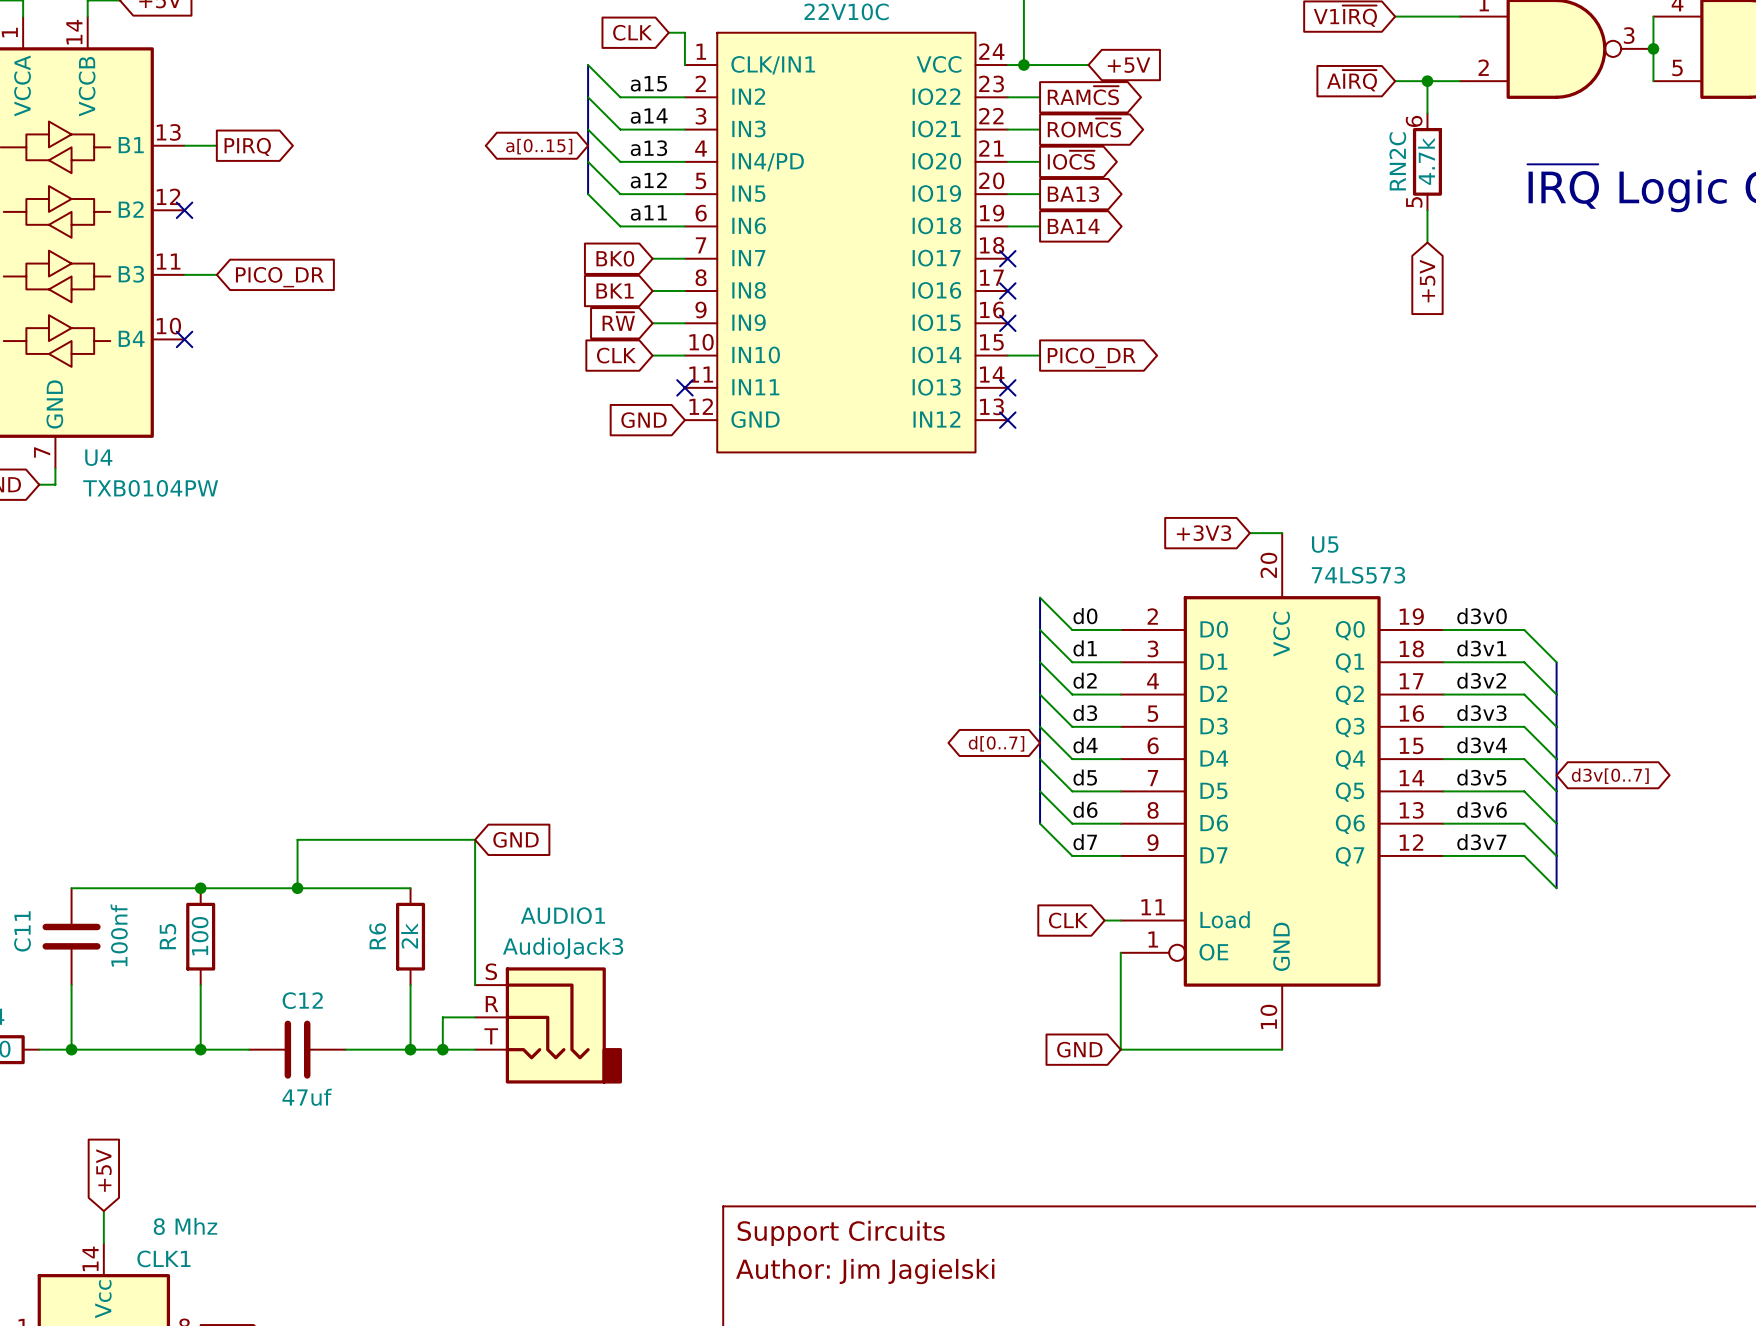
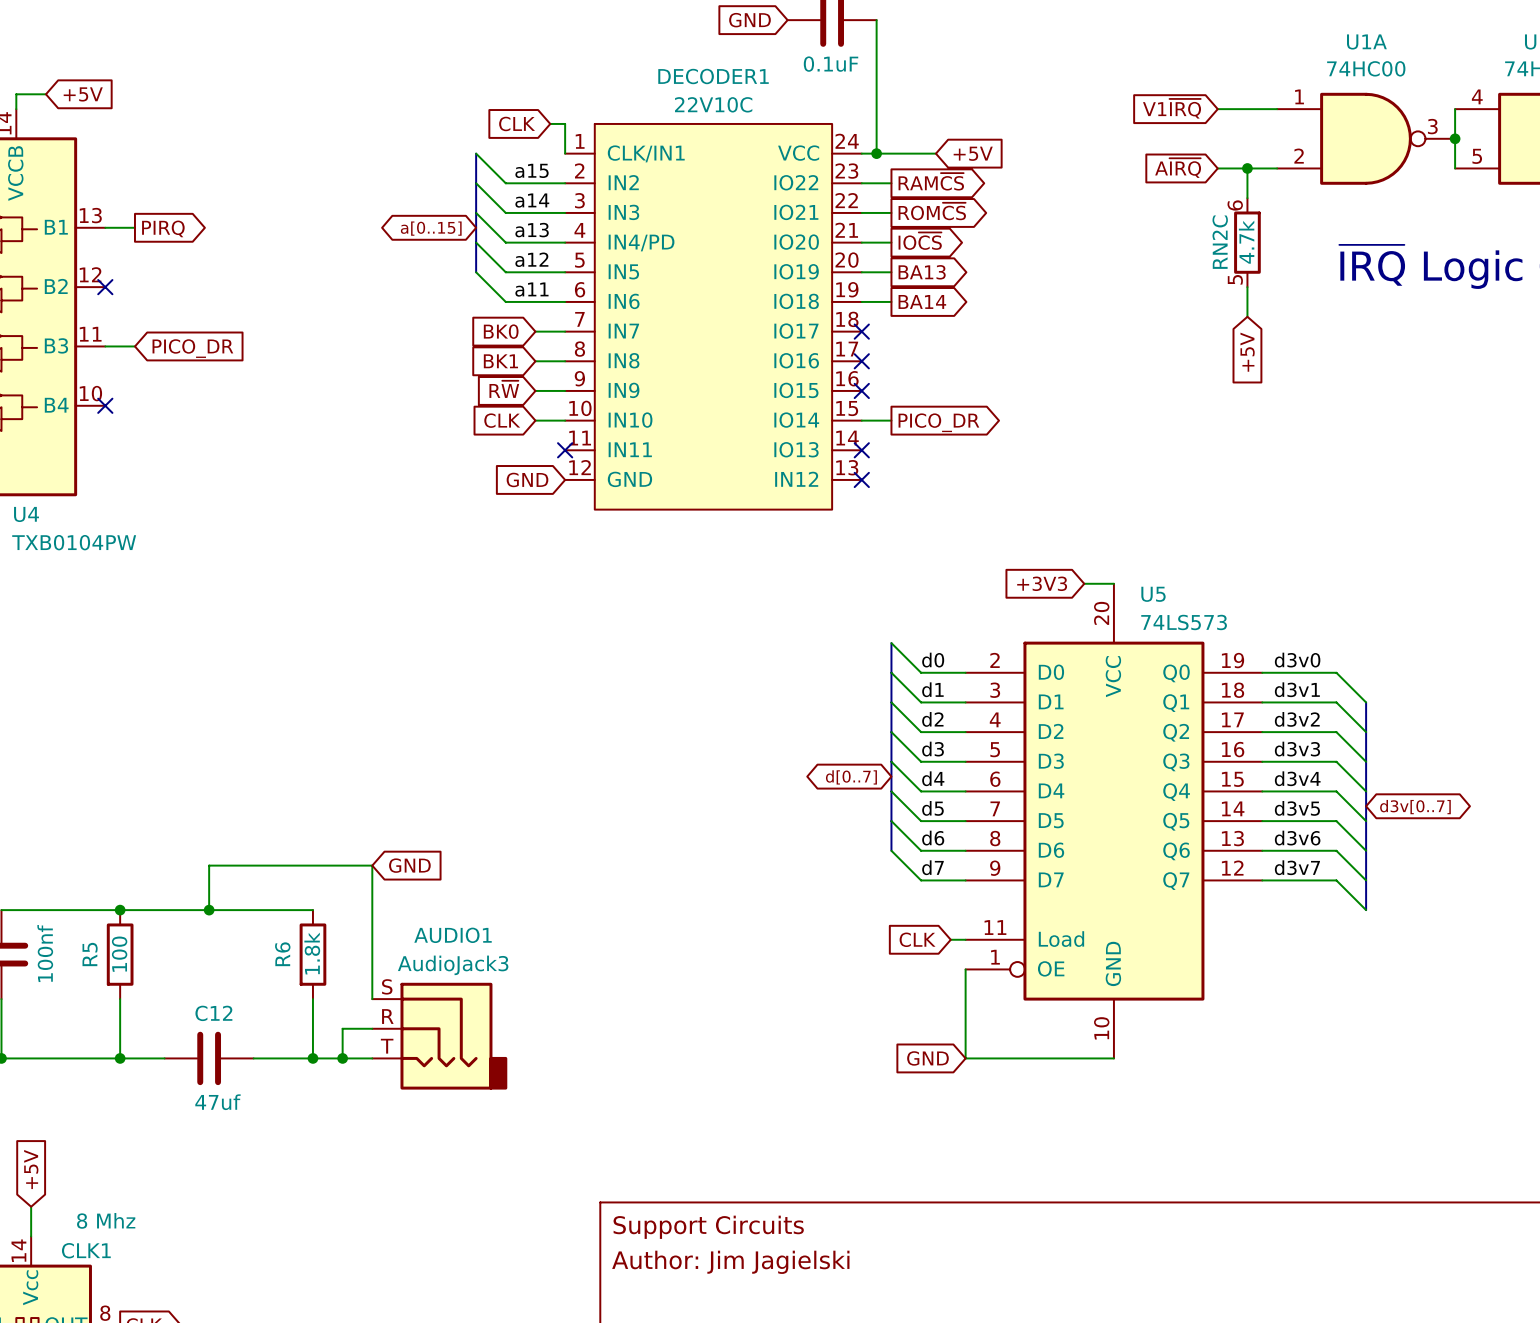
R6 value: 2k (409, 935) -> 1.8k (312, 953)

